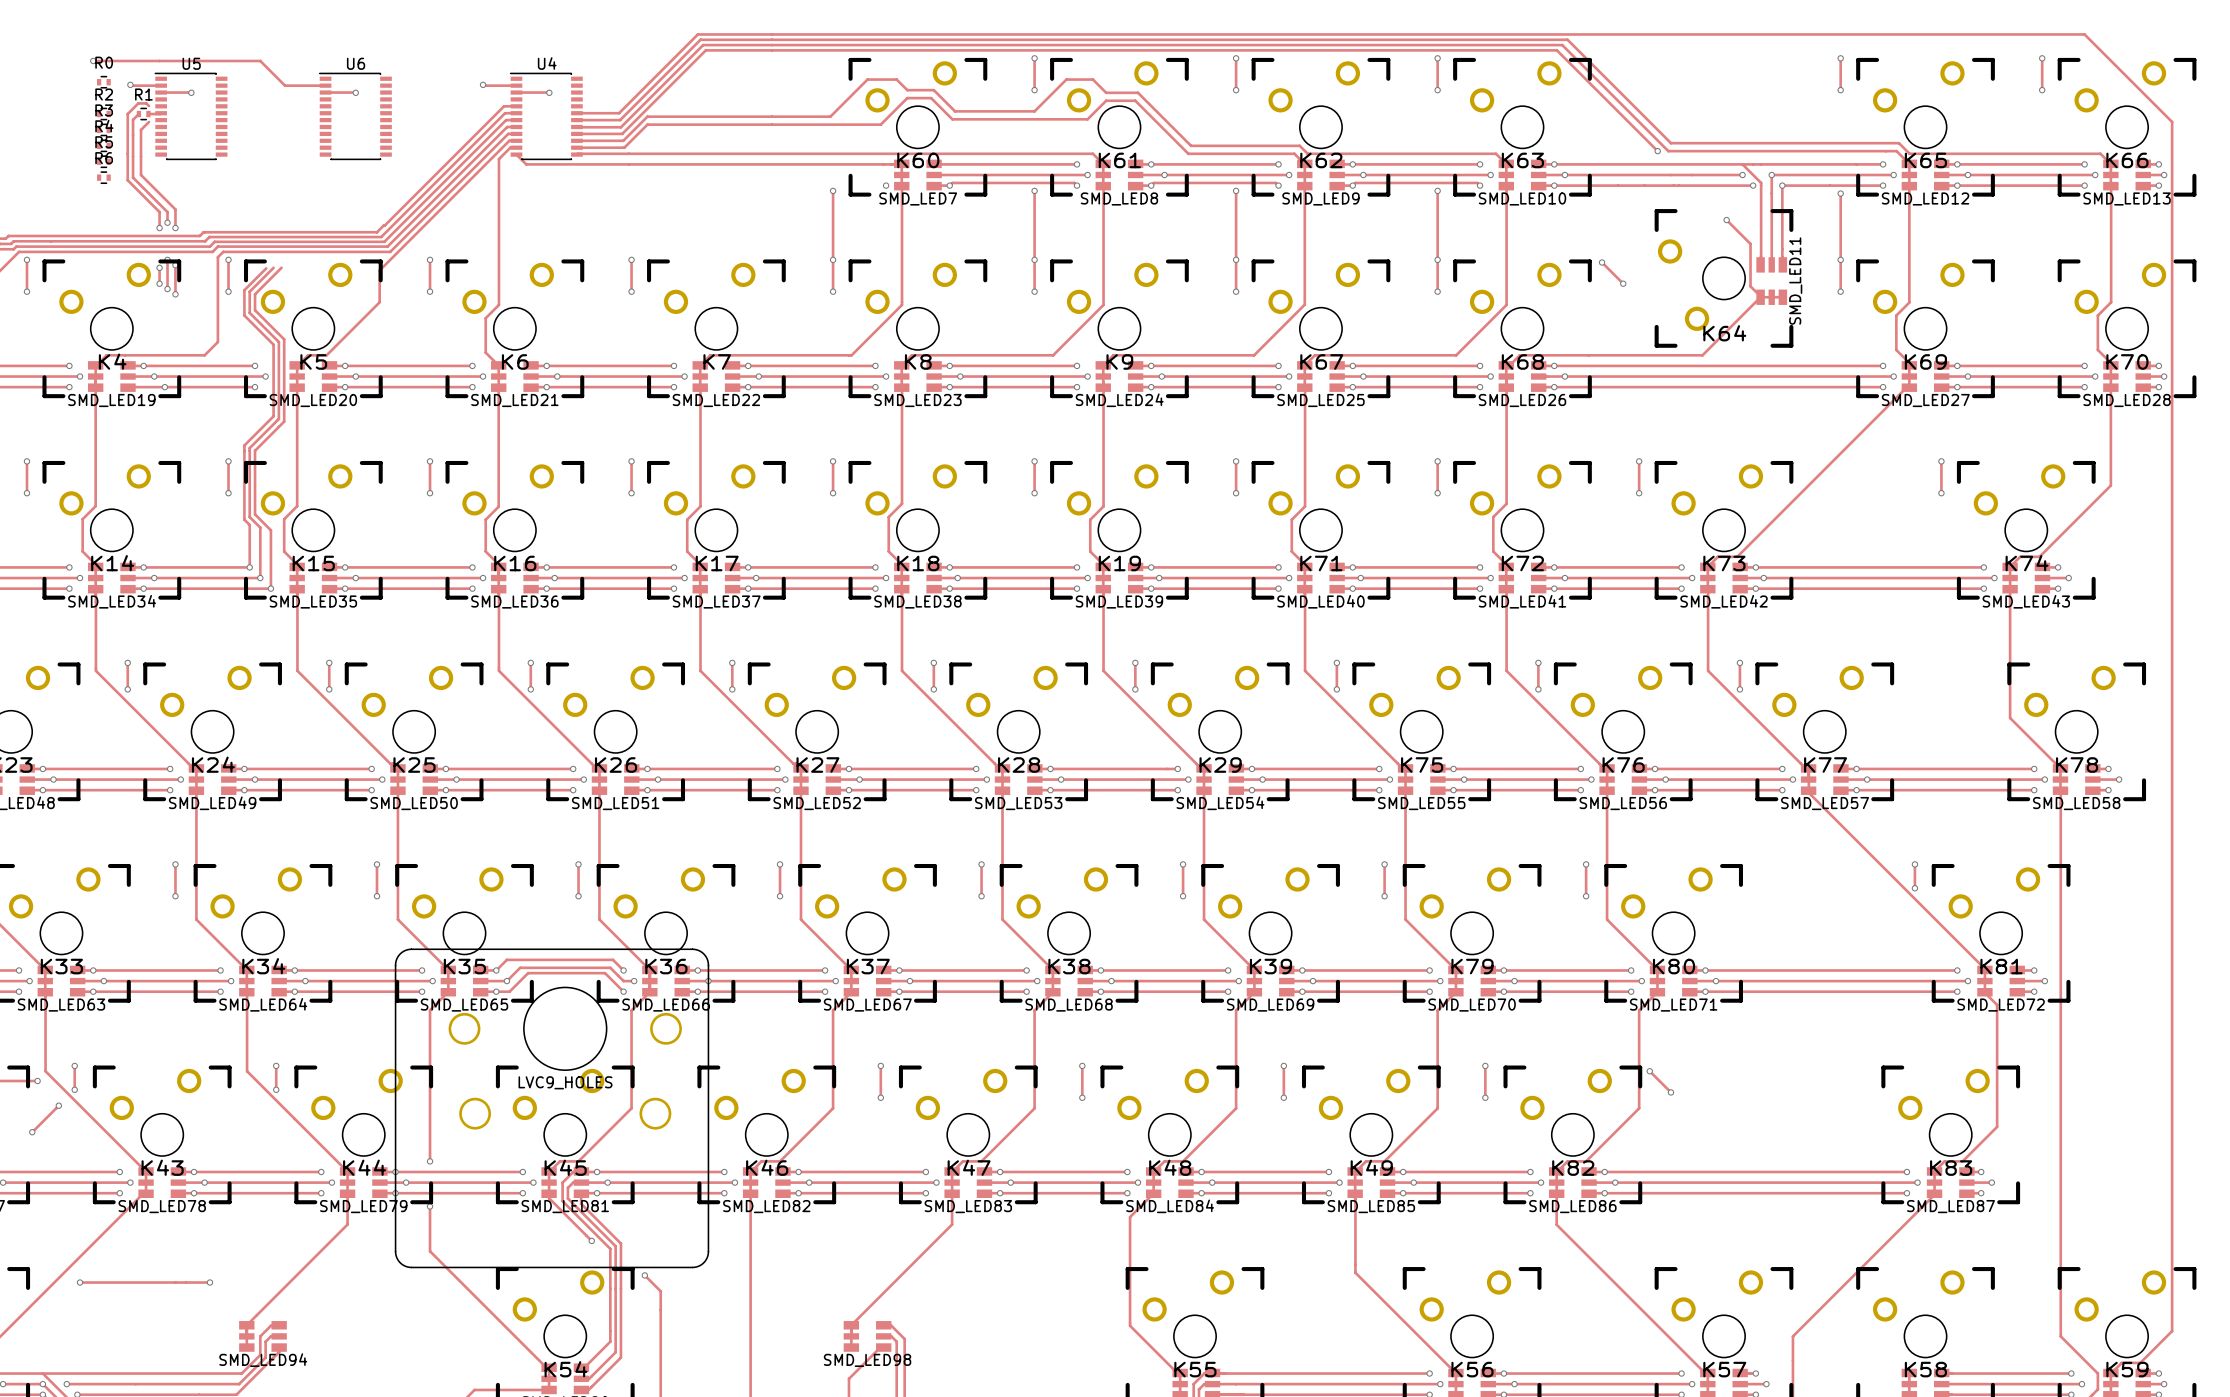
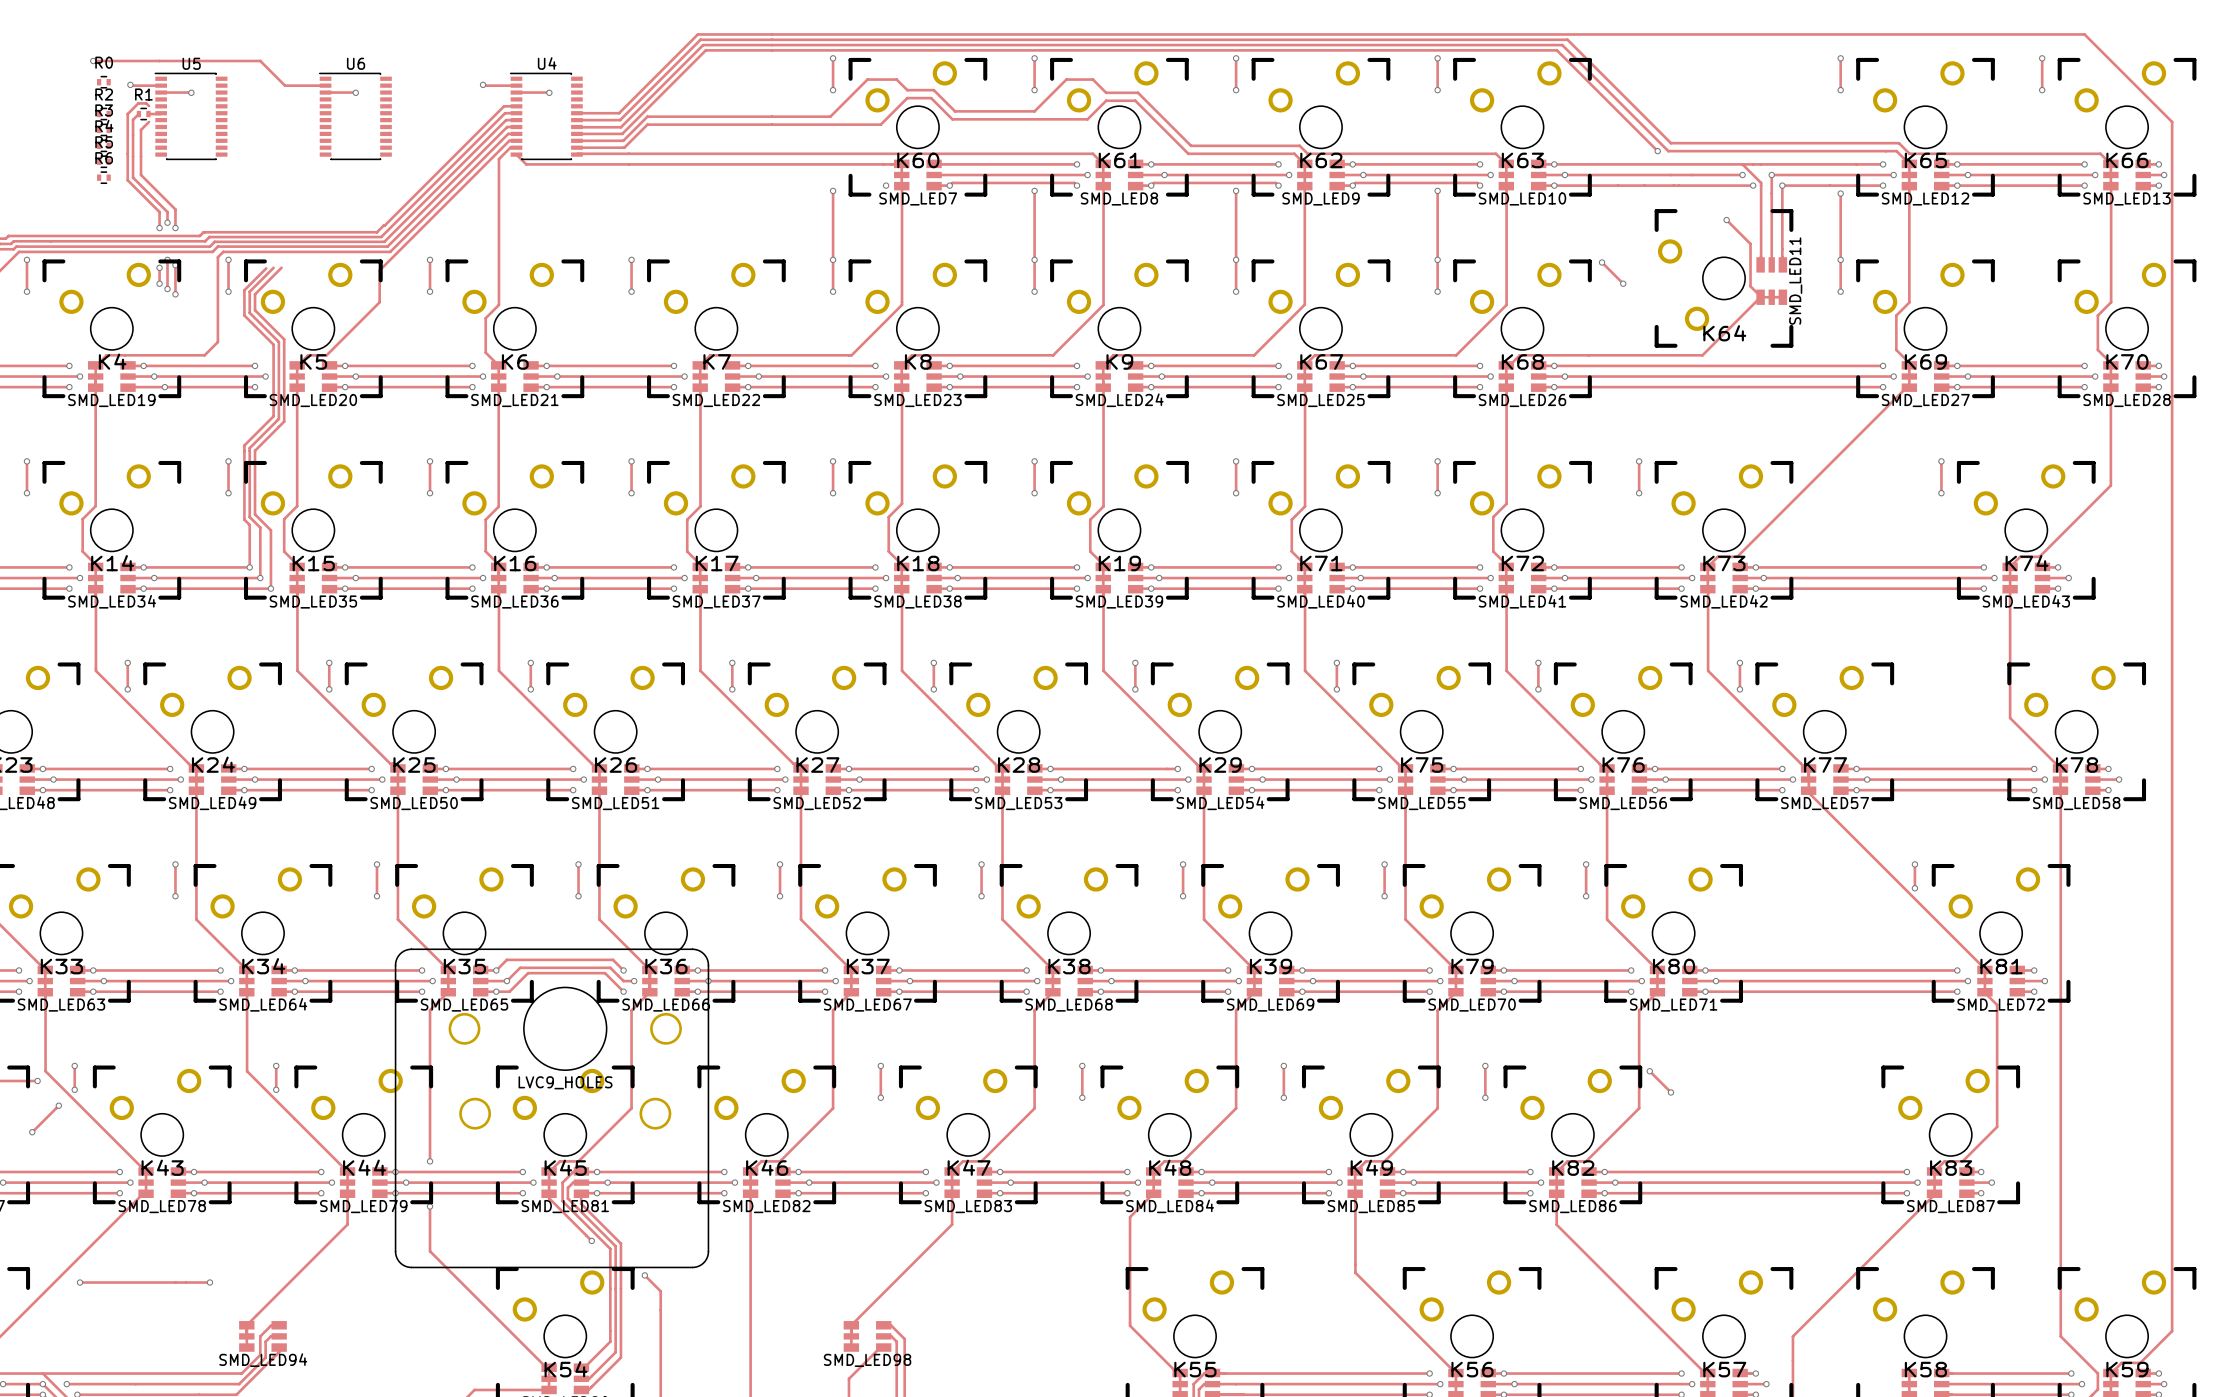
track: none -> (833, 58) (833, 90)
via: none -> (833, 58)
via: none -> (833, 90)

